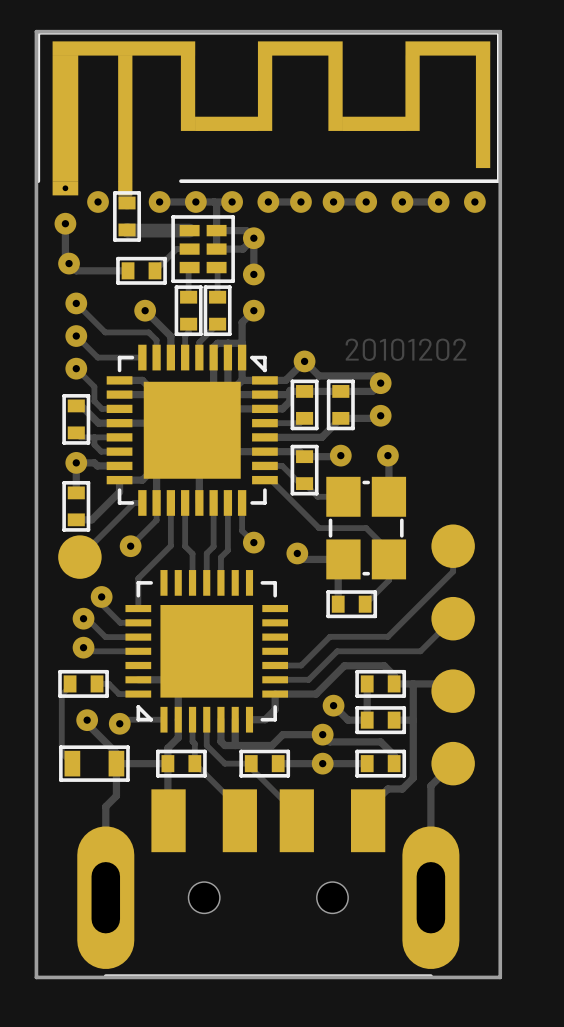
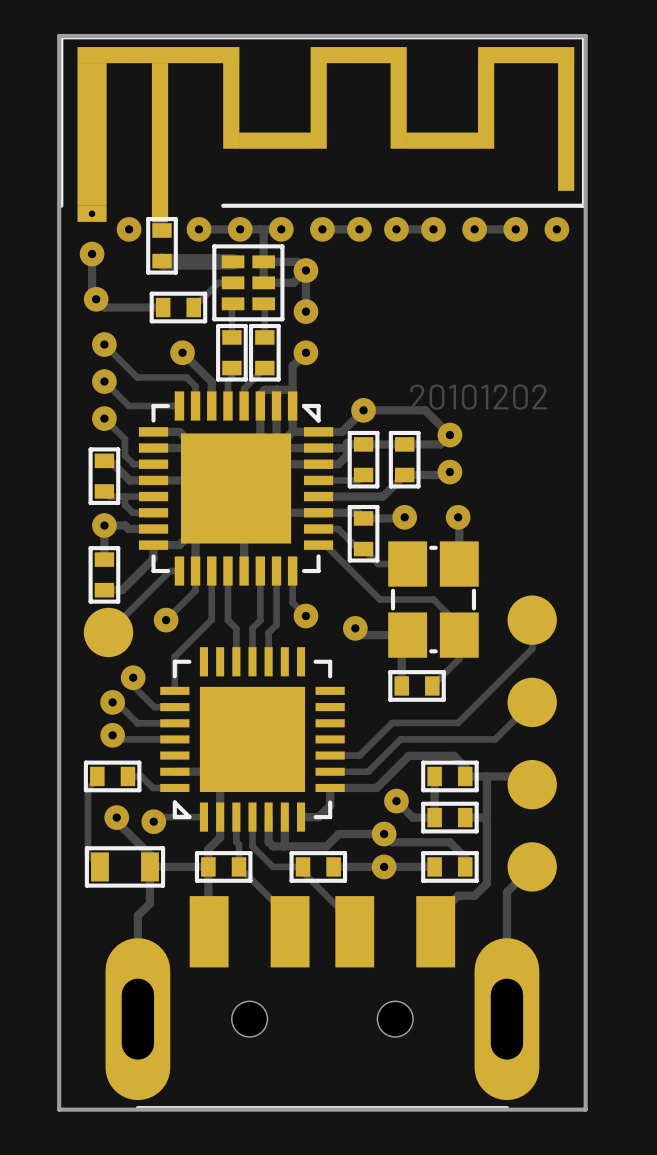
track: (304, 361) (319, 375) (373, 375) -> (363, 410) (425, 410) (441, 426)

